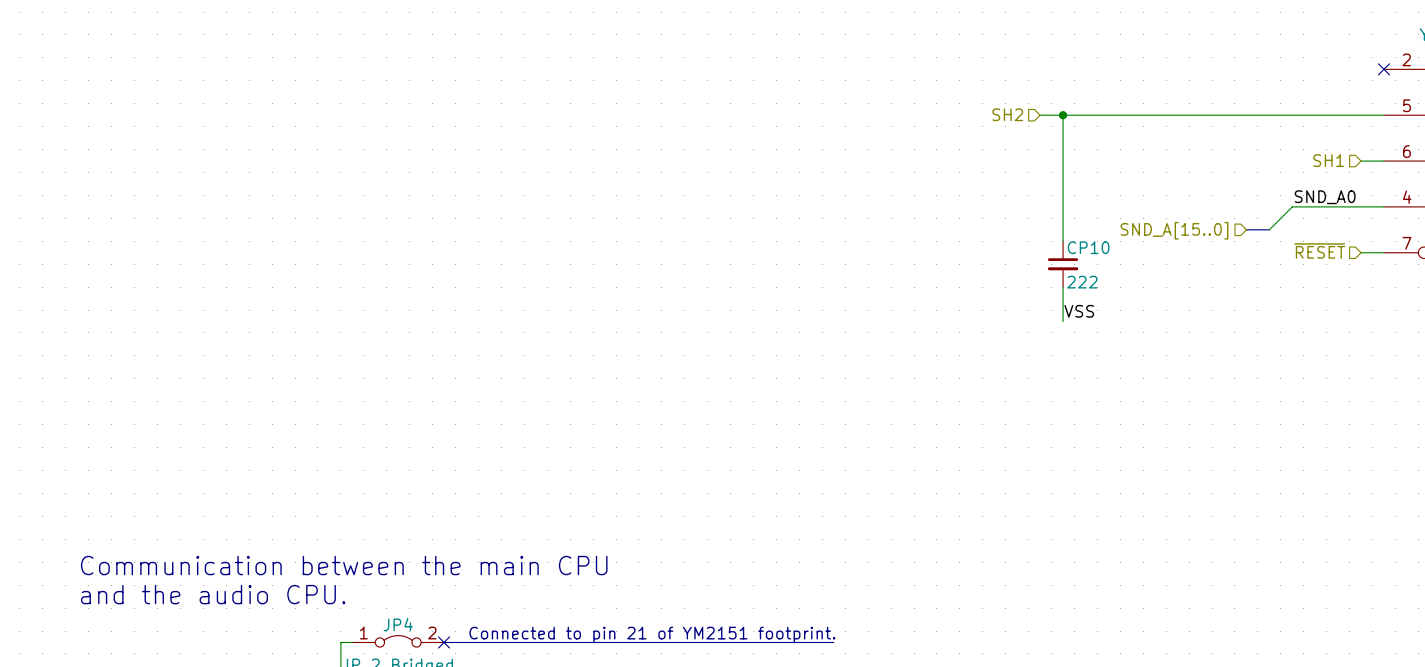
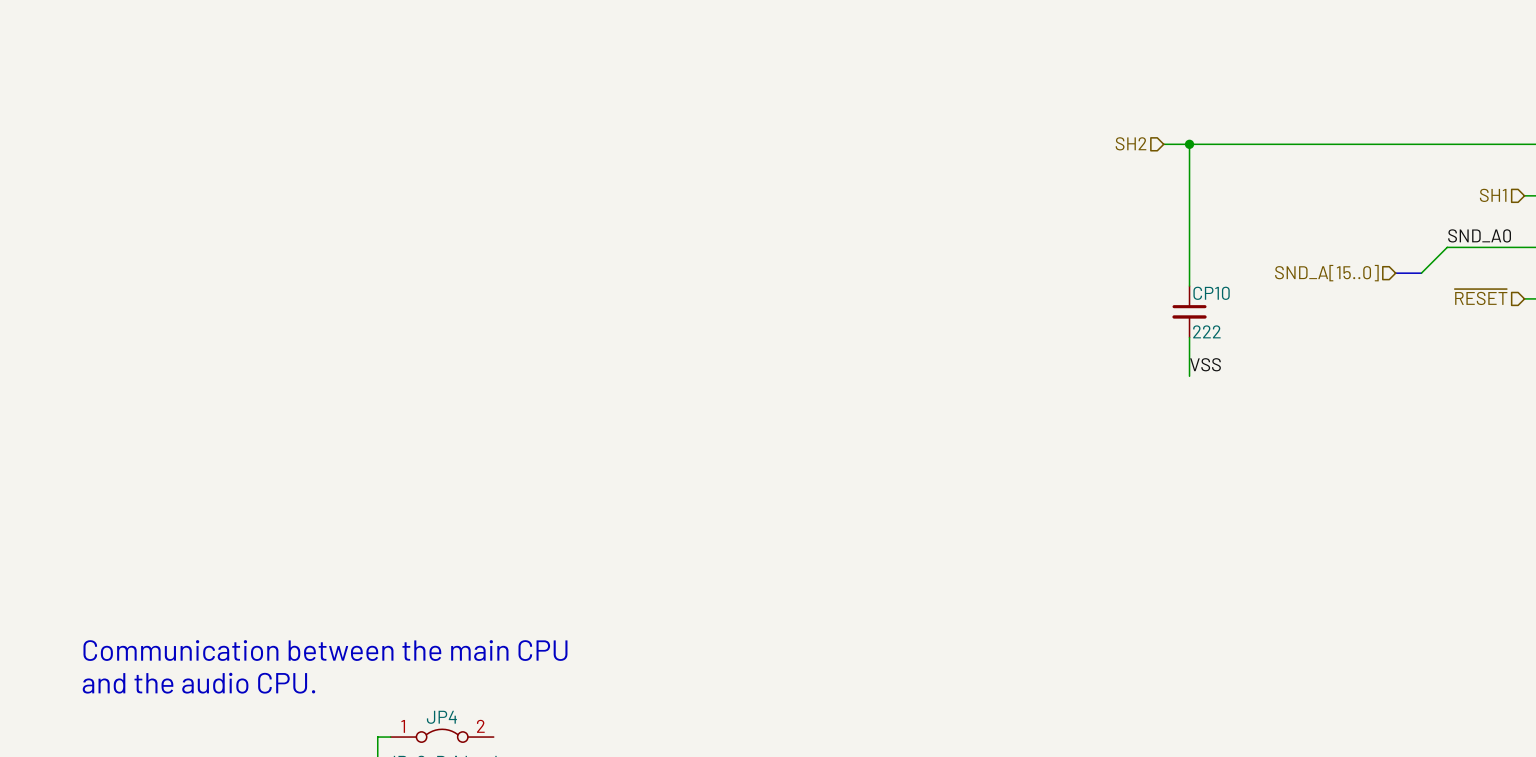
text: Connected to pin 21 of YM2151 footprint. (652, 634) -> none
line: (444, 642) (833, 642) -> none
no-connect mark: (444, 642) -> none

